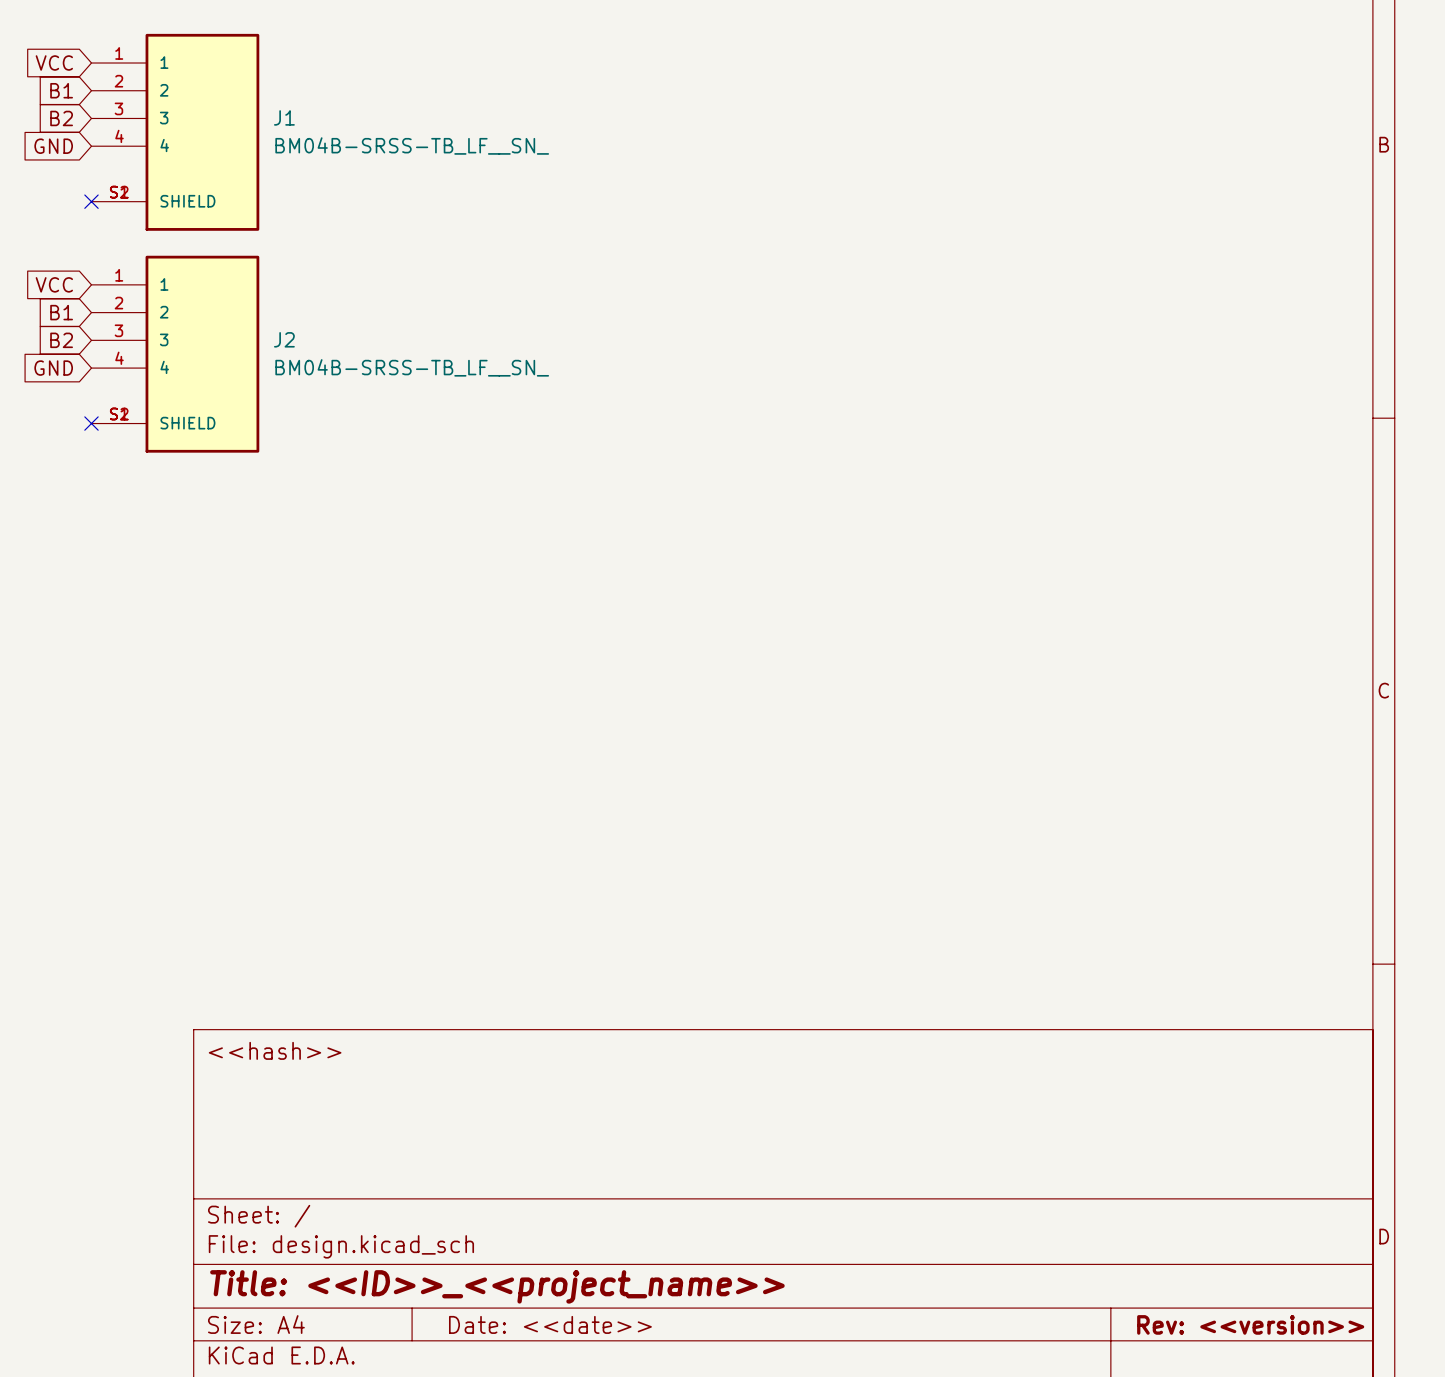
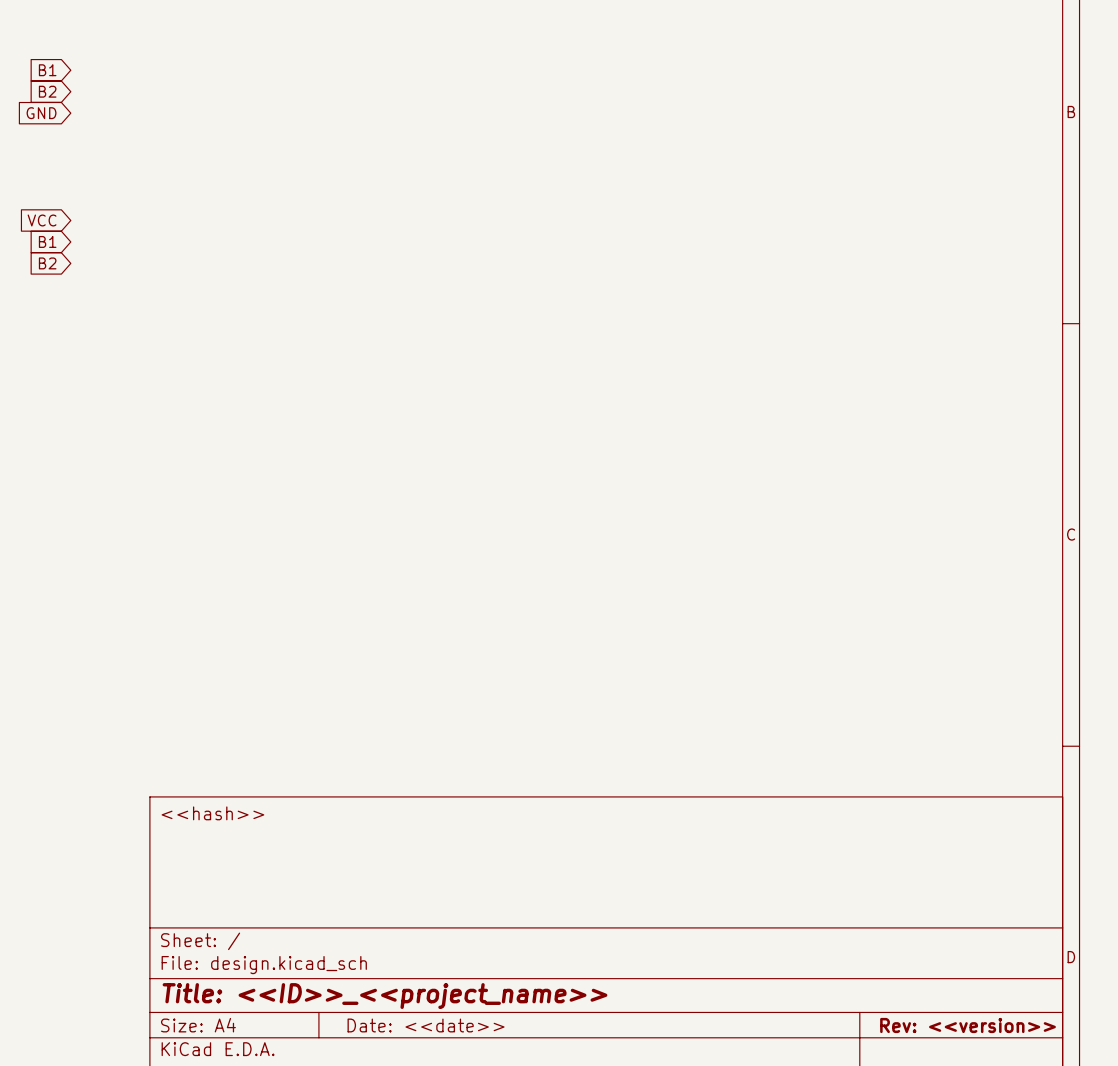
global label: VCC (54, 63) -> none
J1: BM04B-SRSS-TB_LF__SN_ (175, 132) -> none
no-connect mark: (91, 201) -> none
J2: BM04B-SRSS-TB_LF__SN_ (175, 354) -> none
global label: GND (53, 368) -> none
no-connect mark: (91, 423) -> none

